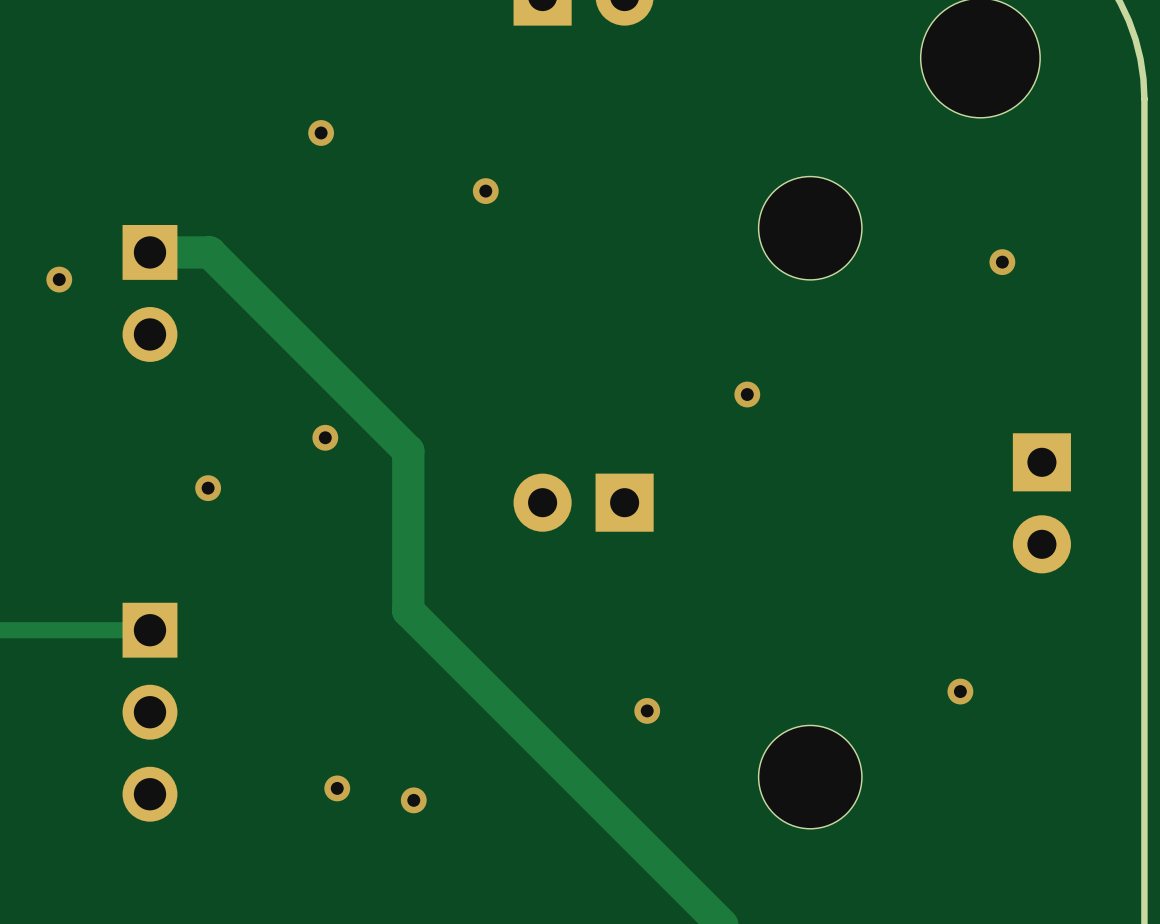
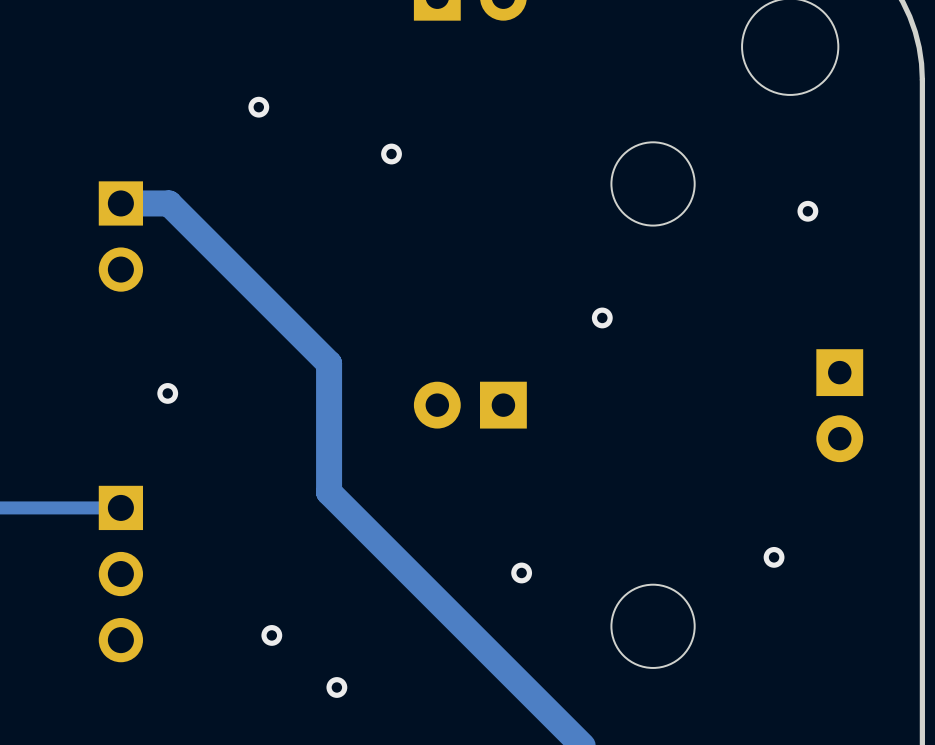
via: (59, 279) -> none
via: (325, 437) -> none
via position: (413, 800) -> (336, 687)

